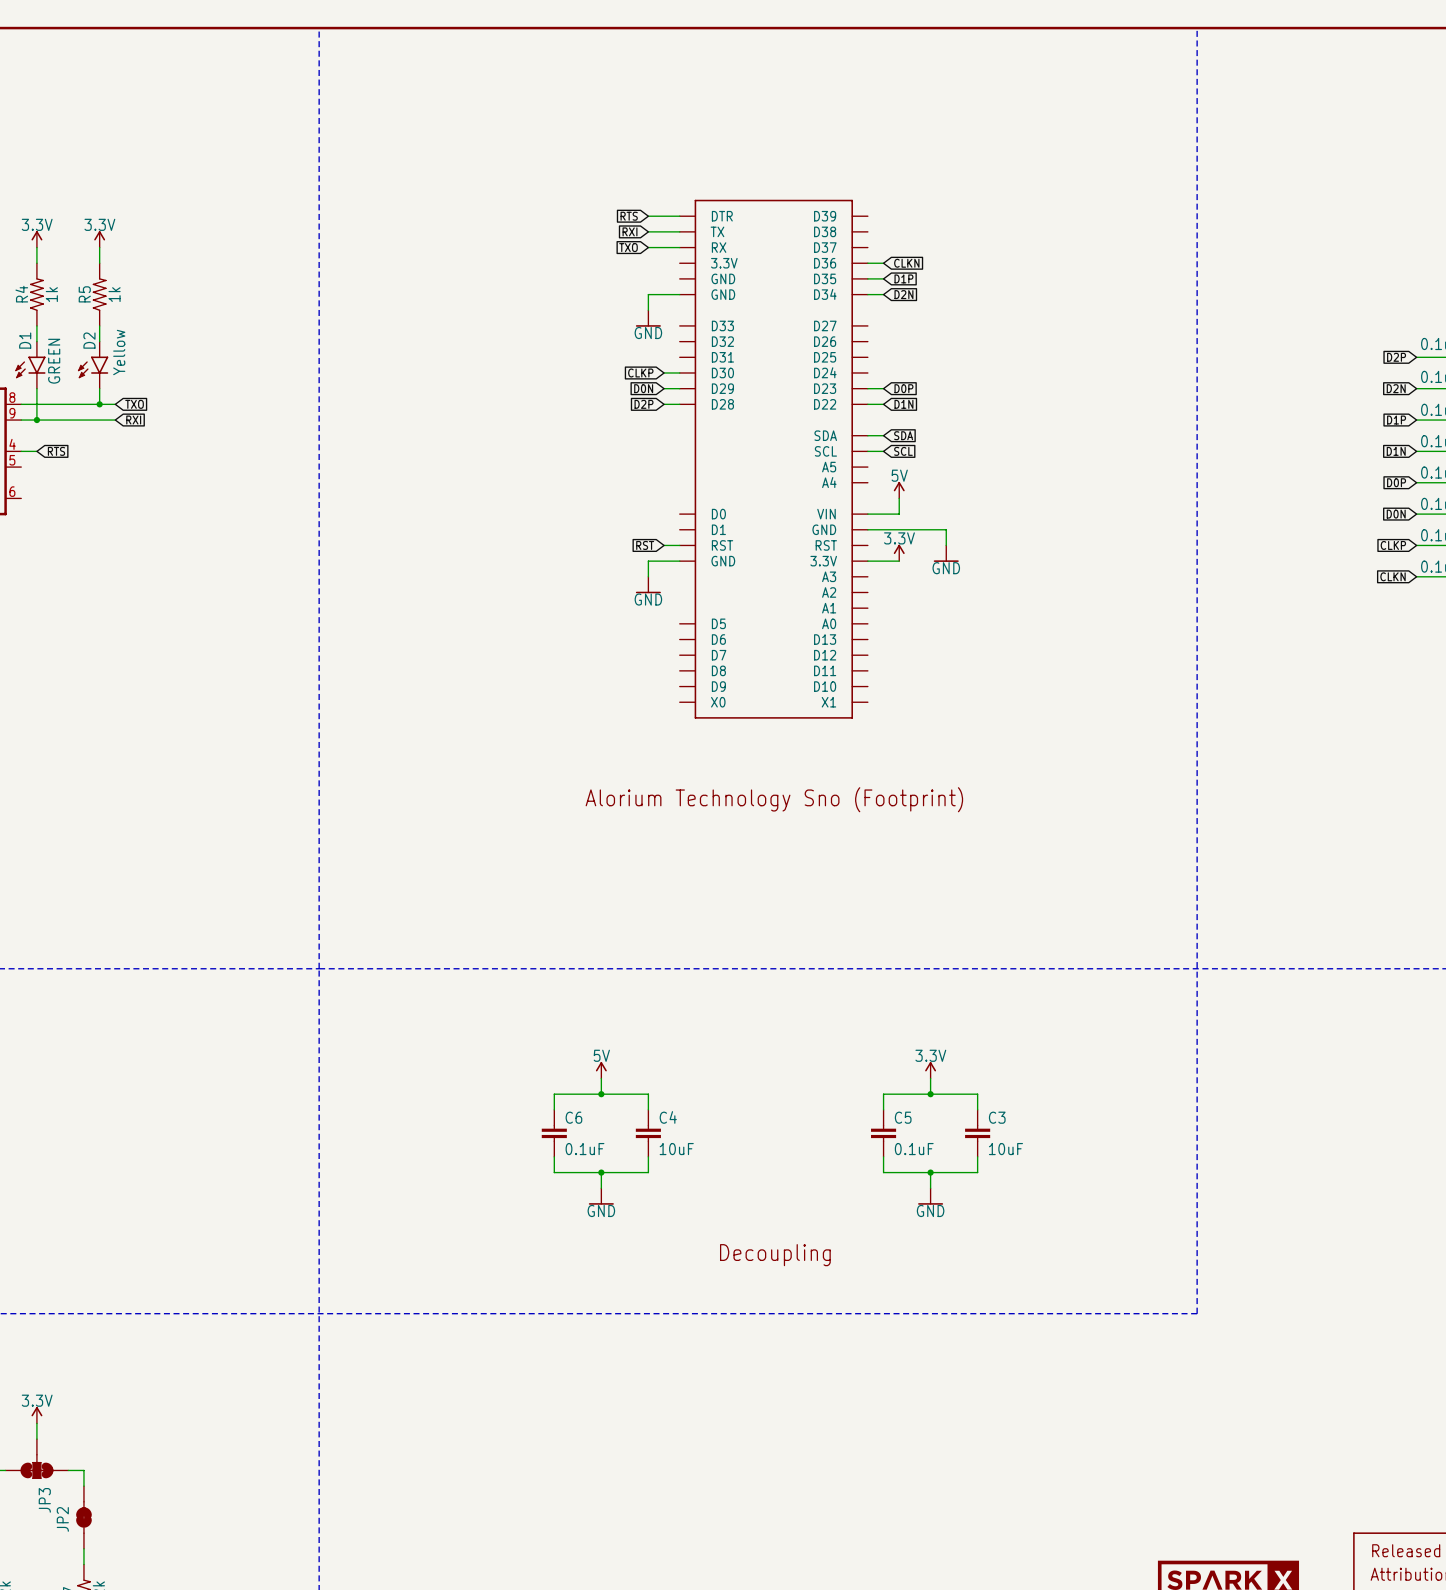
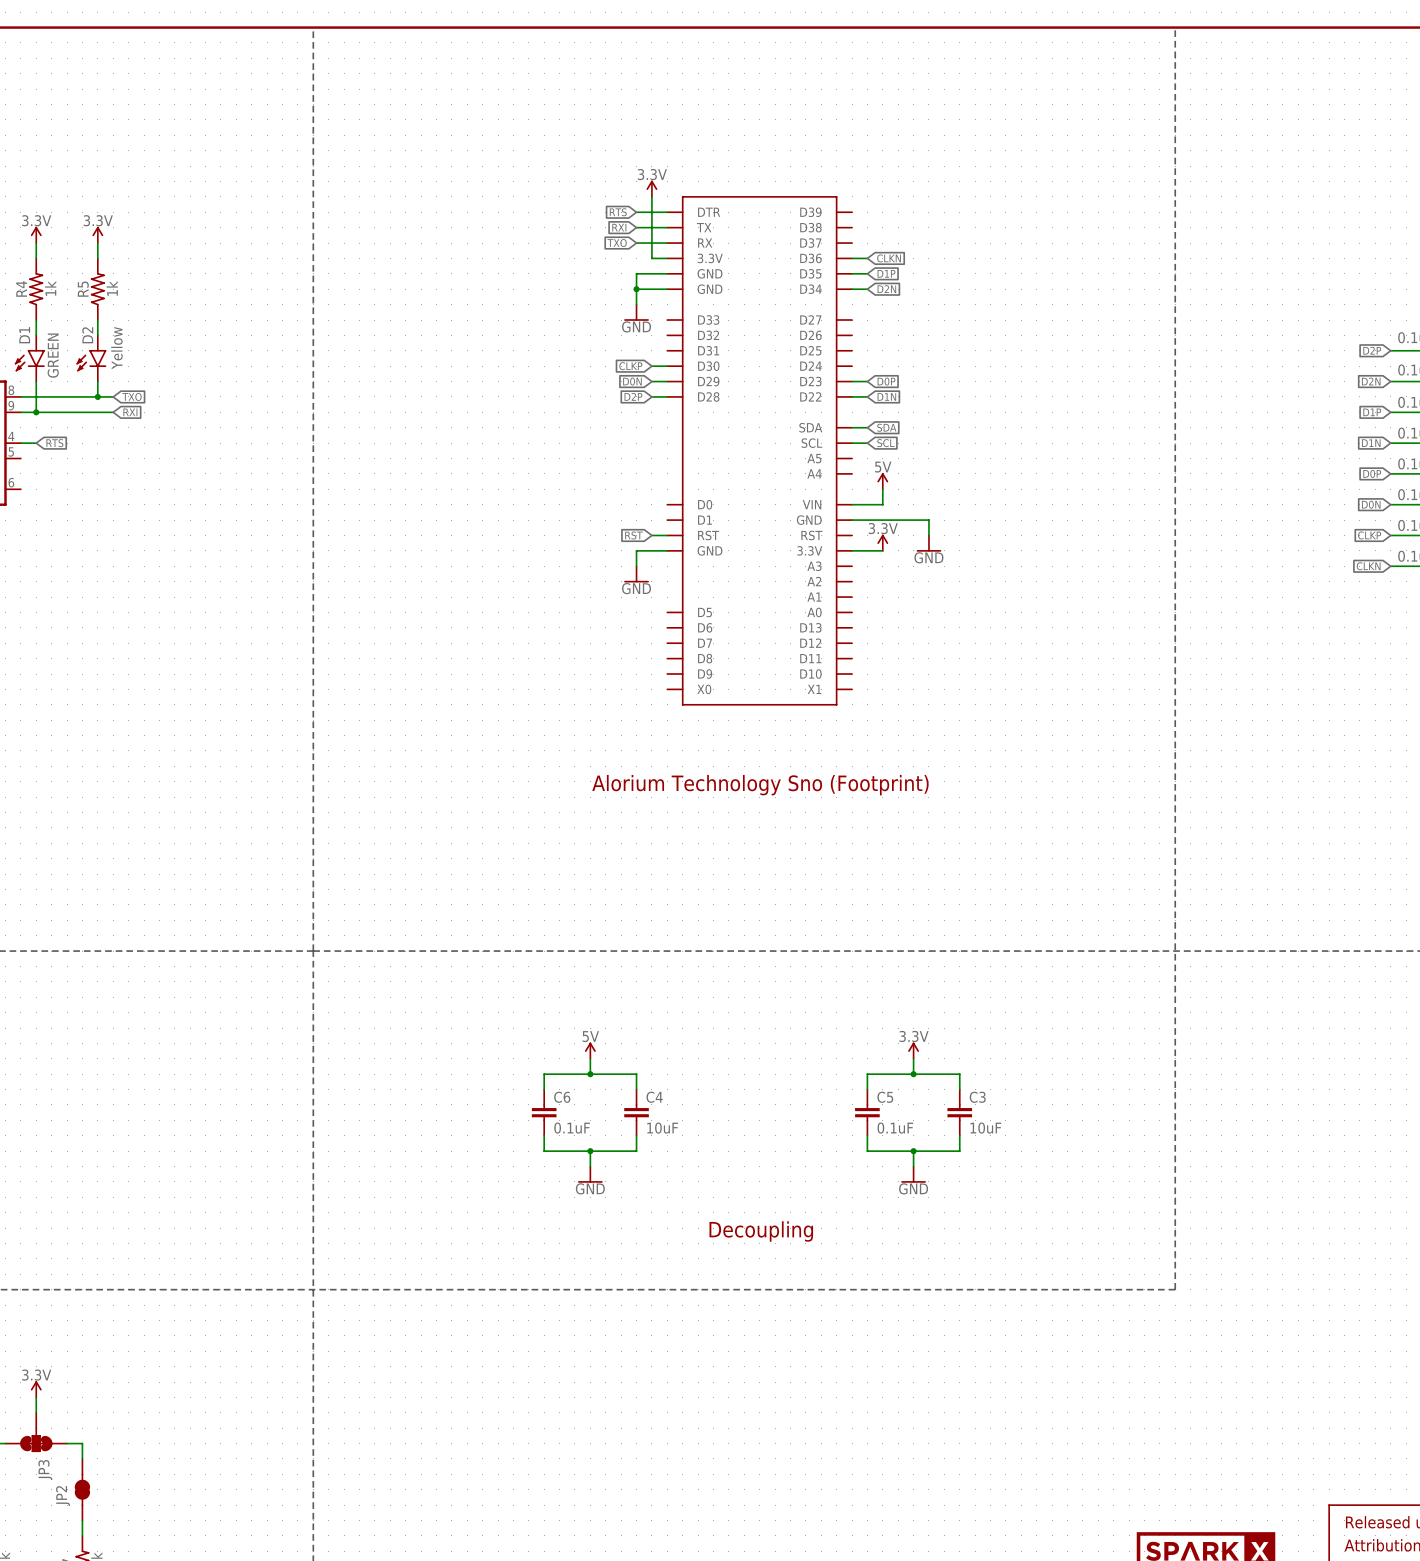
power symbol: none -> 3.3V (651, 188)
wire: none -> (651, 196) (651, 258) (667, 258)
wire: none -> (667, 273) (636, 273) (636, 289)
junction: none -> (636, 289)

